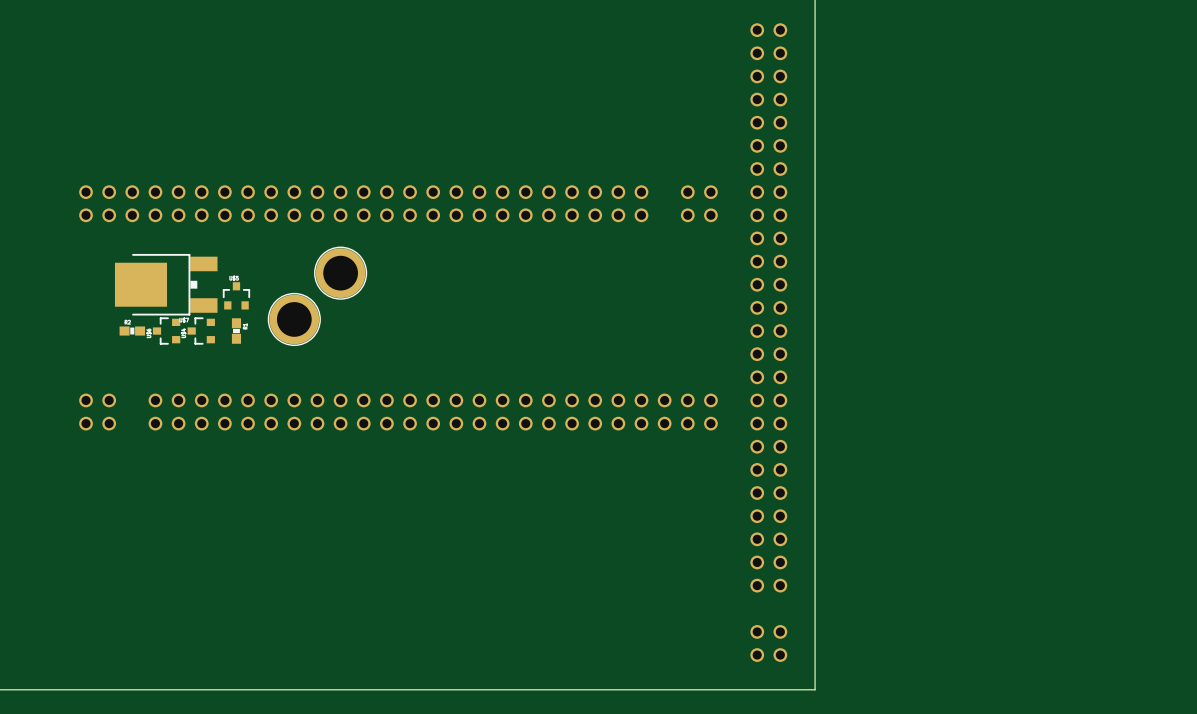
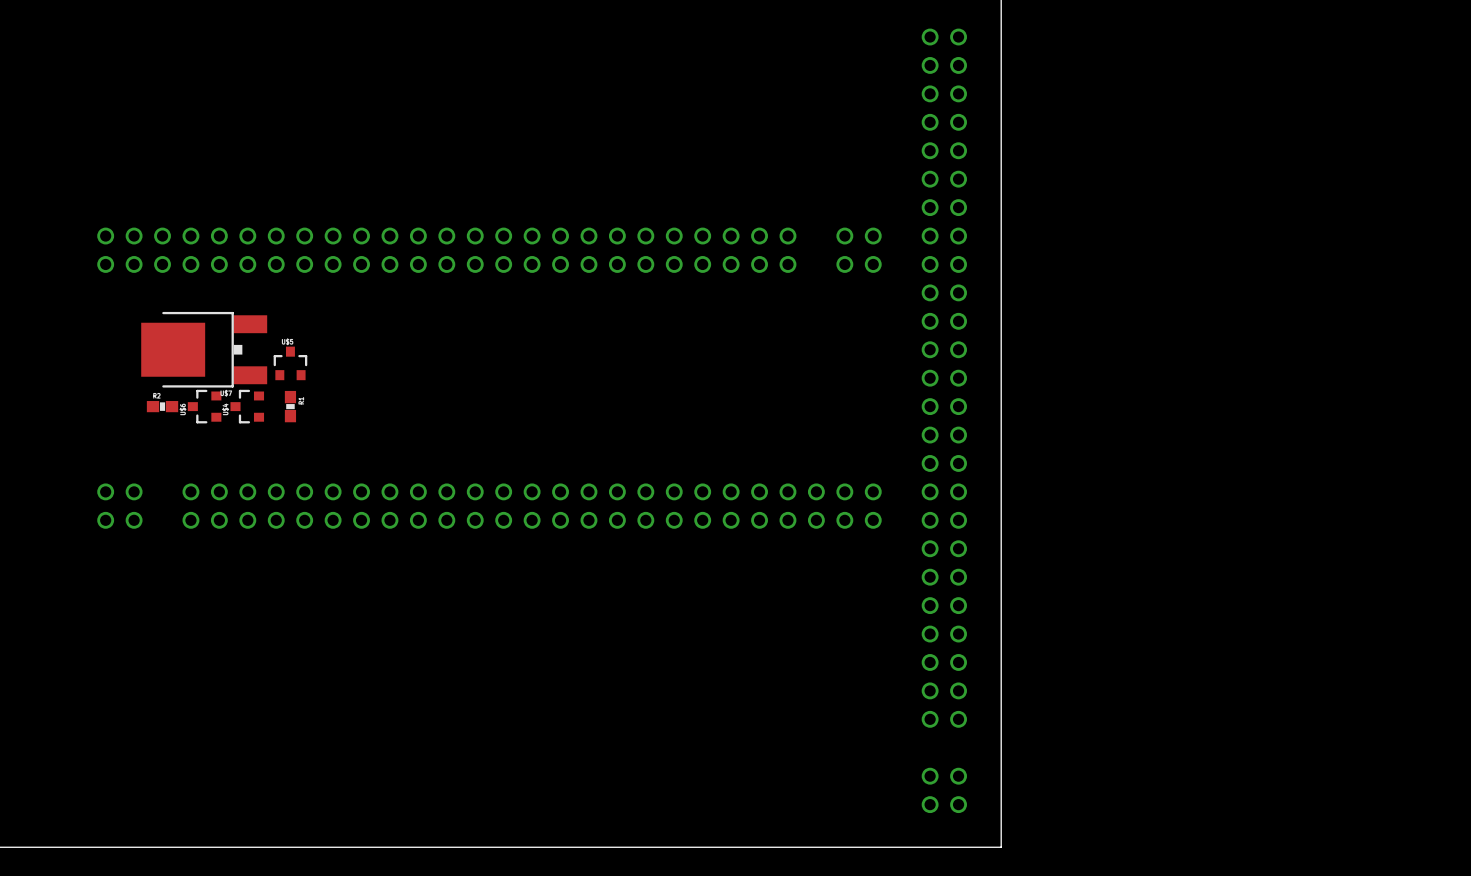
part: (340, 273) -> none
part: (294, 319) -> none

